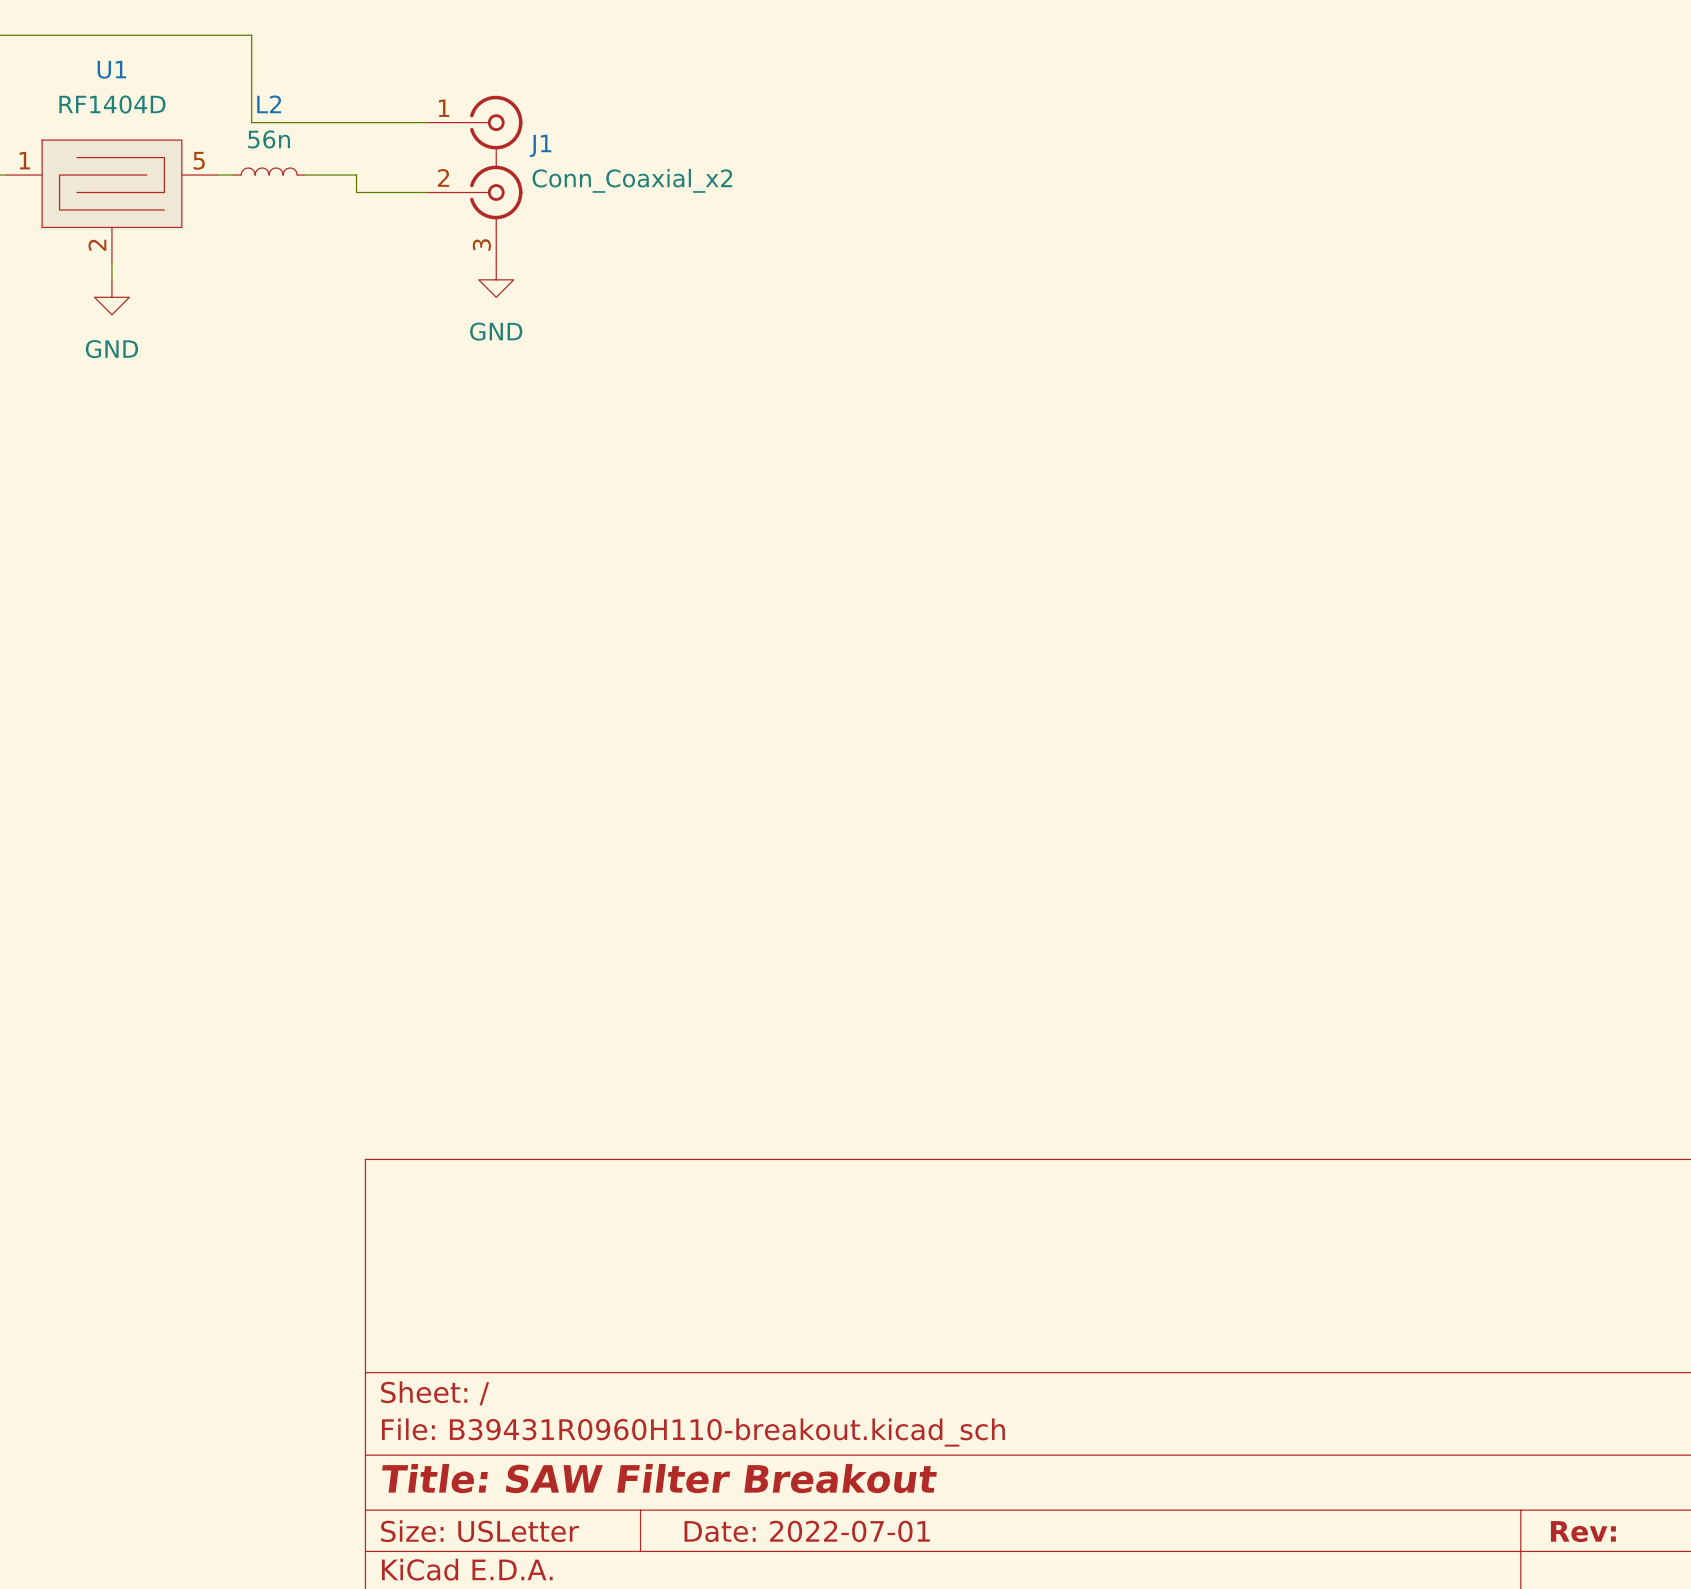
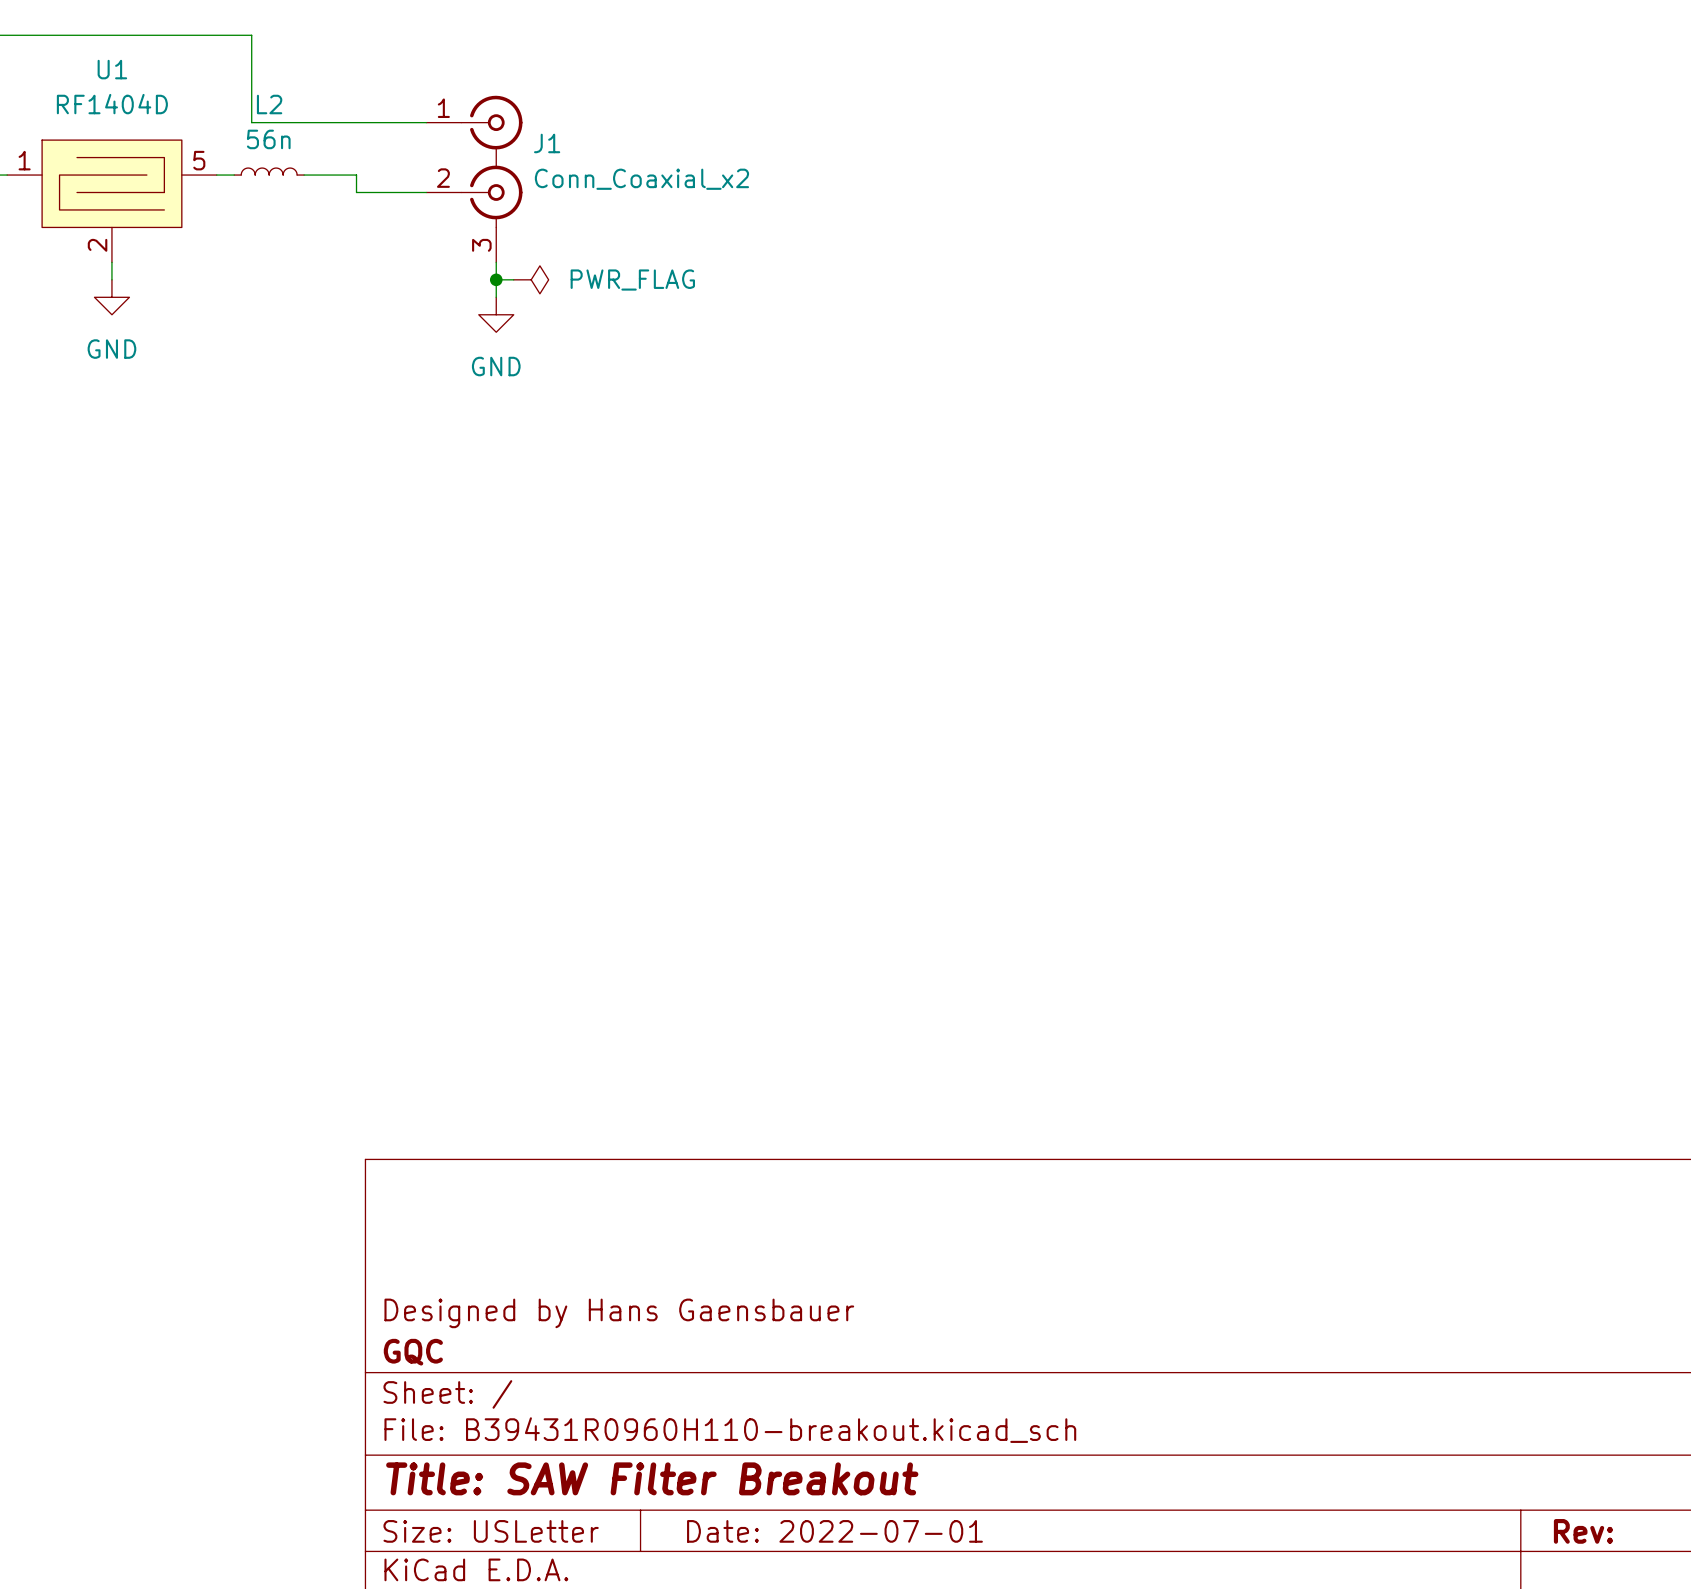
power symbol position: GND (496, 279) -> GND (496, 314)
junction: none -> (496, 279)
power symbol: none -> PWR_FLAG (531, 279)
title block: none -> Designed by Hans Gaensbauer (619, 1313)
title block: none -> GQC (413, 1352)

